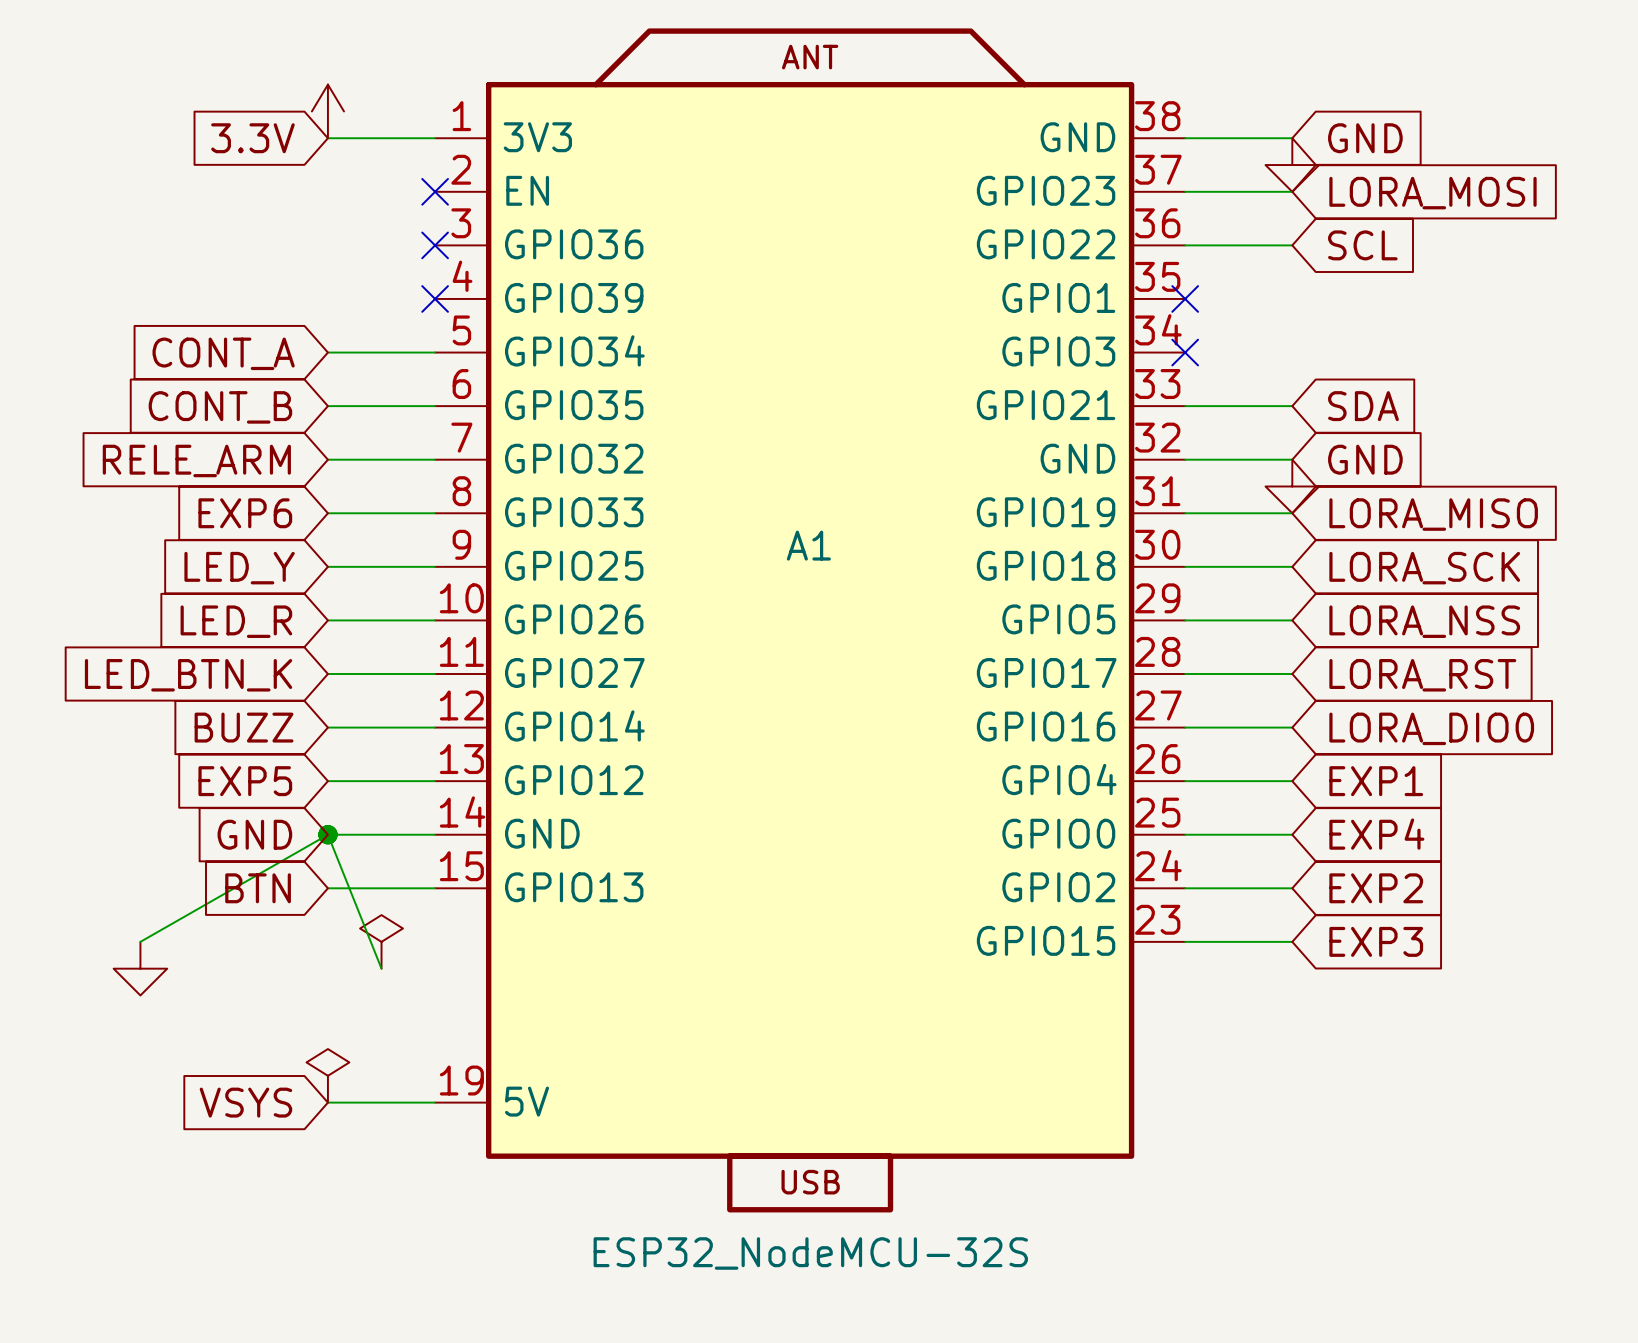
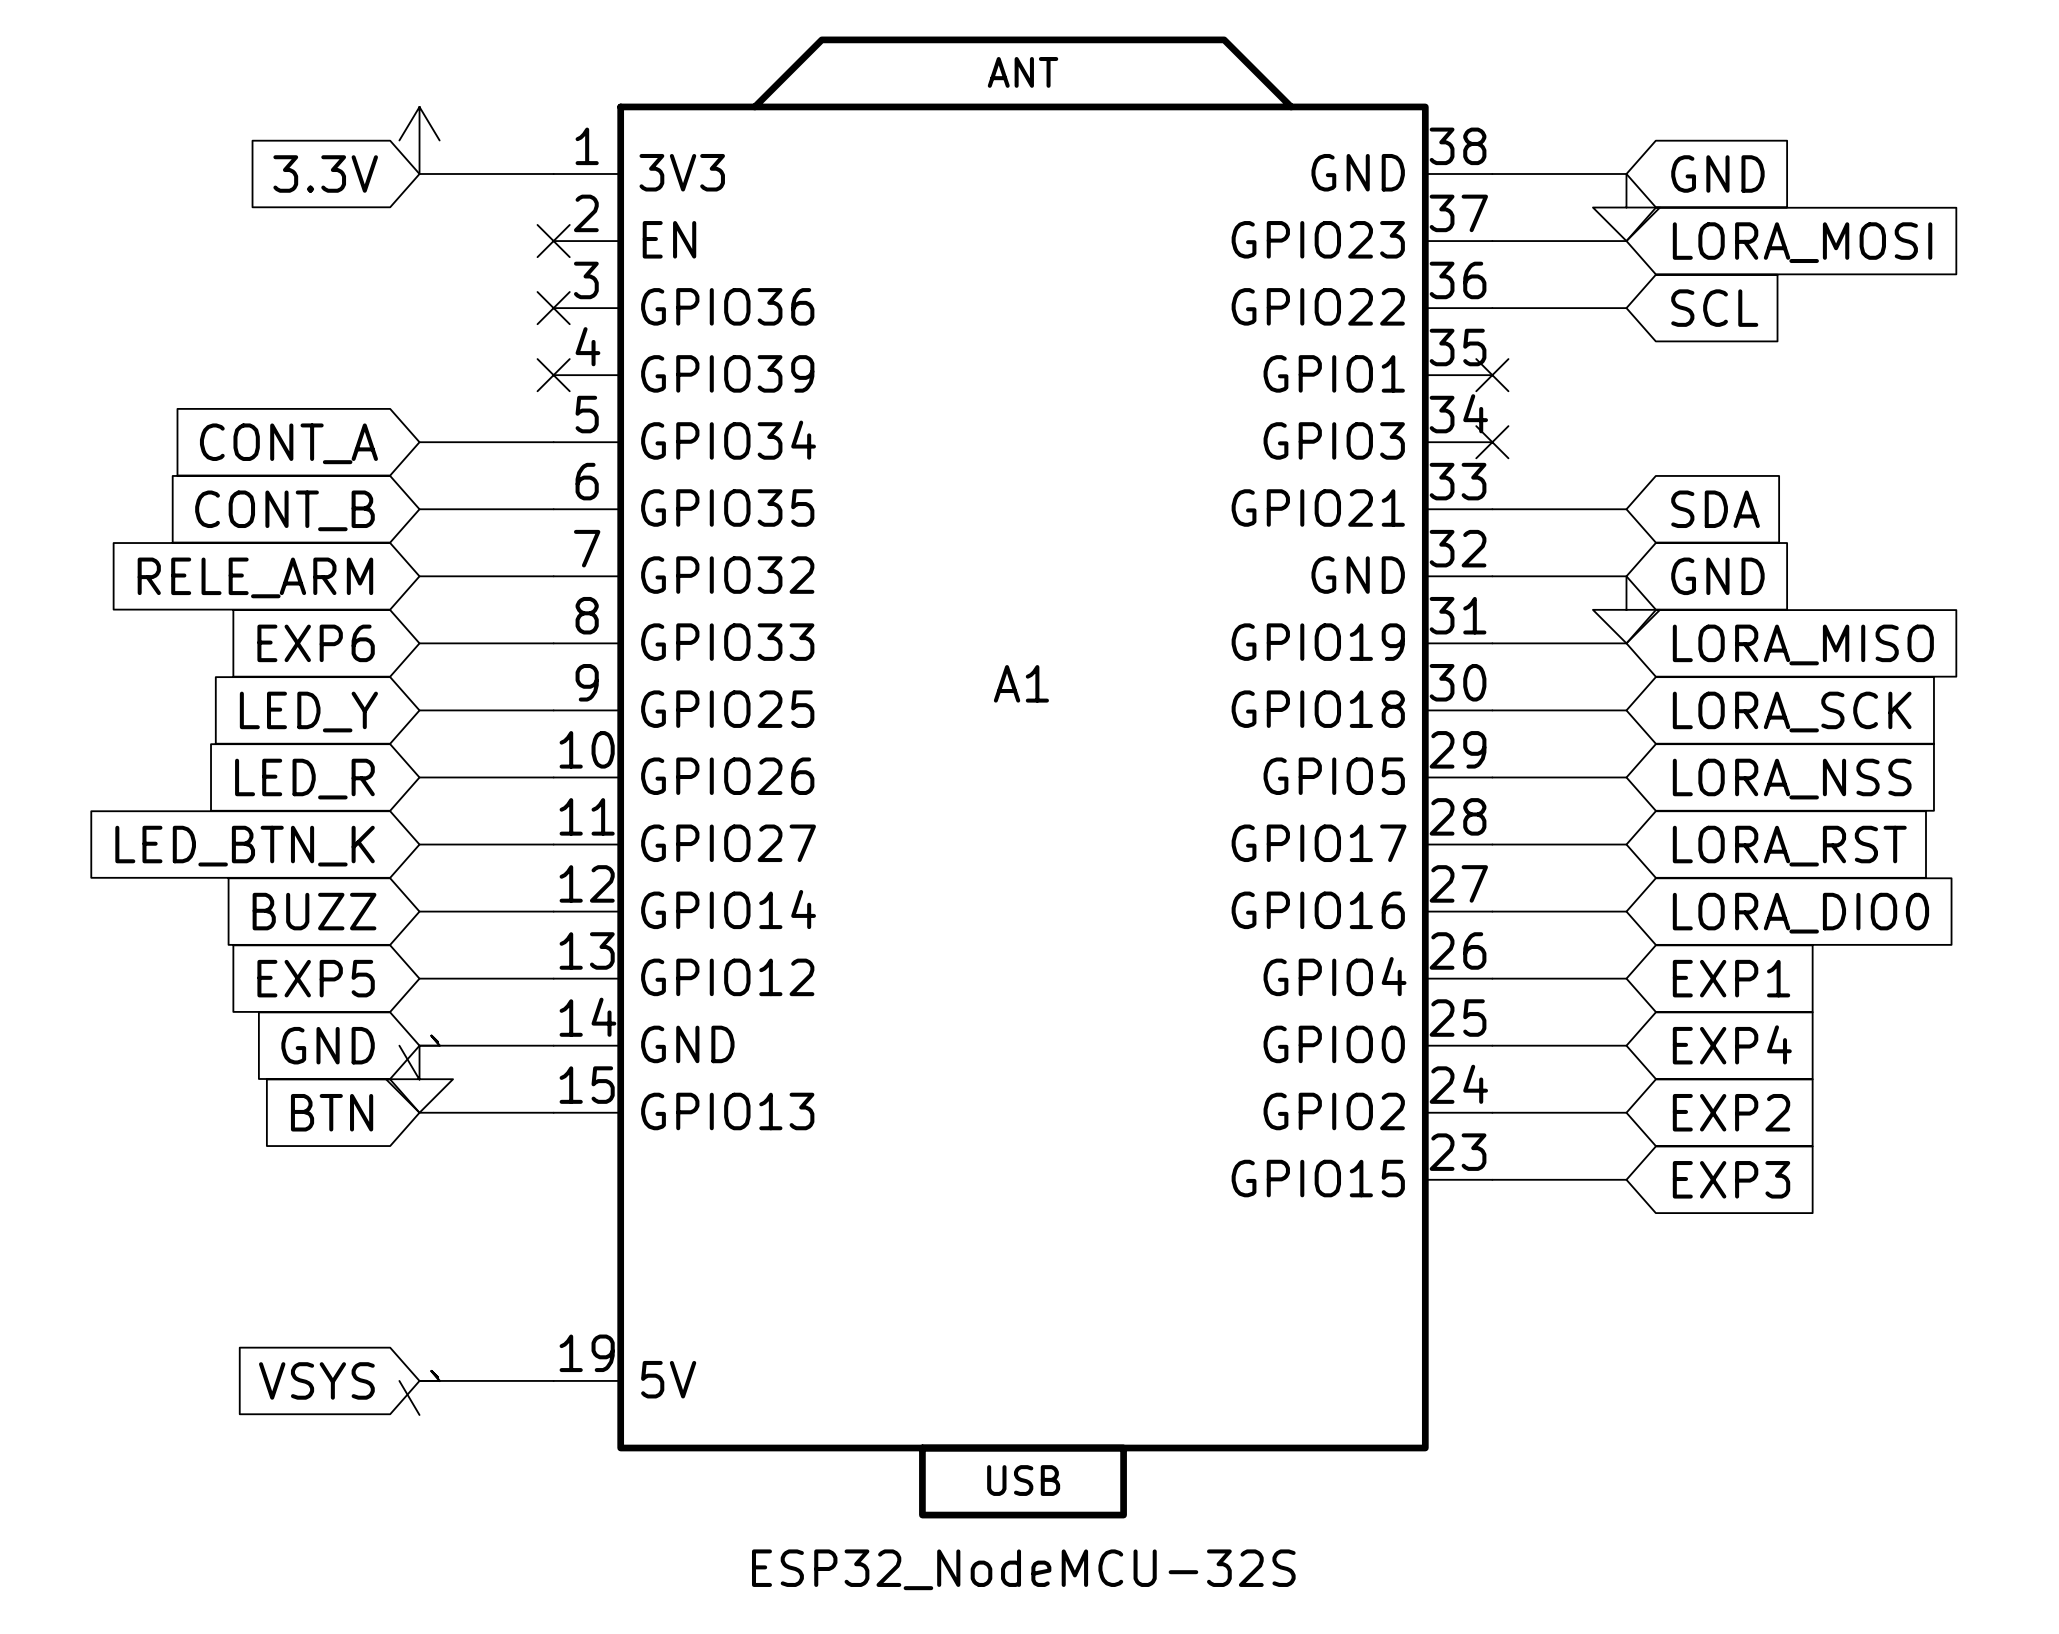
junction: (327, 834) -> none
power symbol: none -> (420, 1057)
wire: (140, 941) (327, 834) (381, 968) -> none
power symbol: (381, 941) -> none
power symbol position: (140, 968) -> (419, 1079)
power symbol: (327, 1075) -> none
power symbol: none -> (420, 1392)

